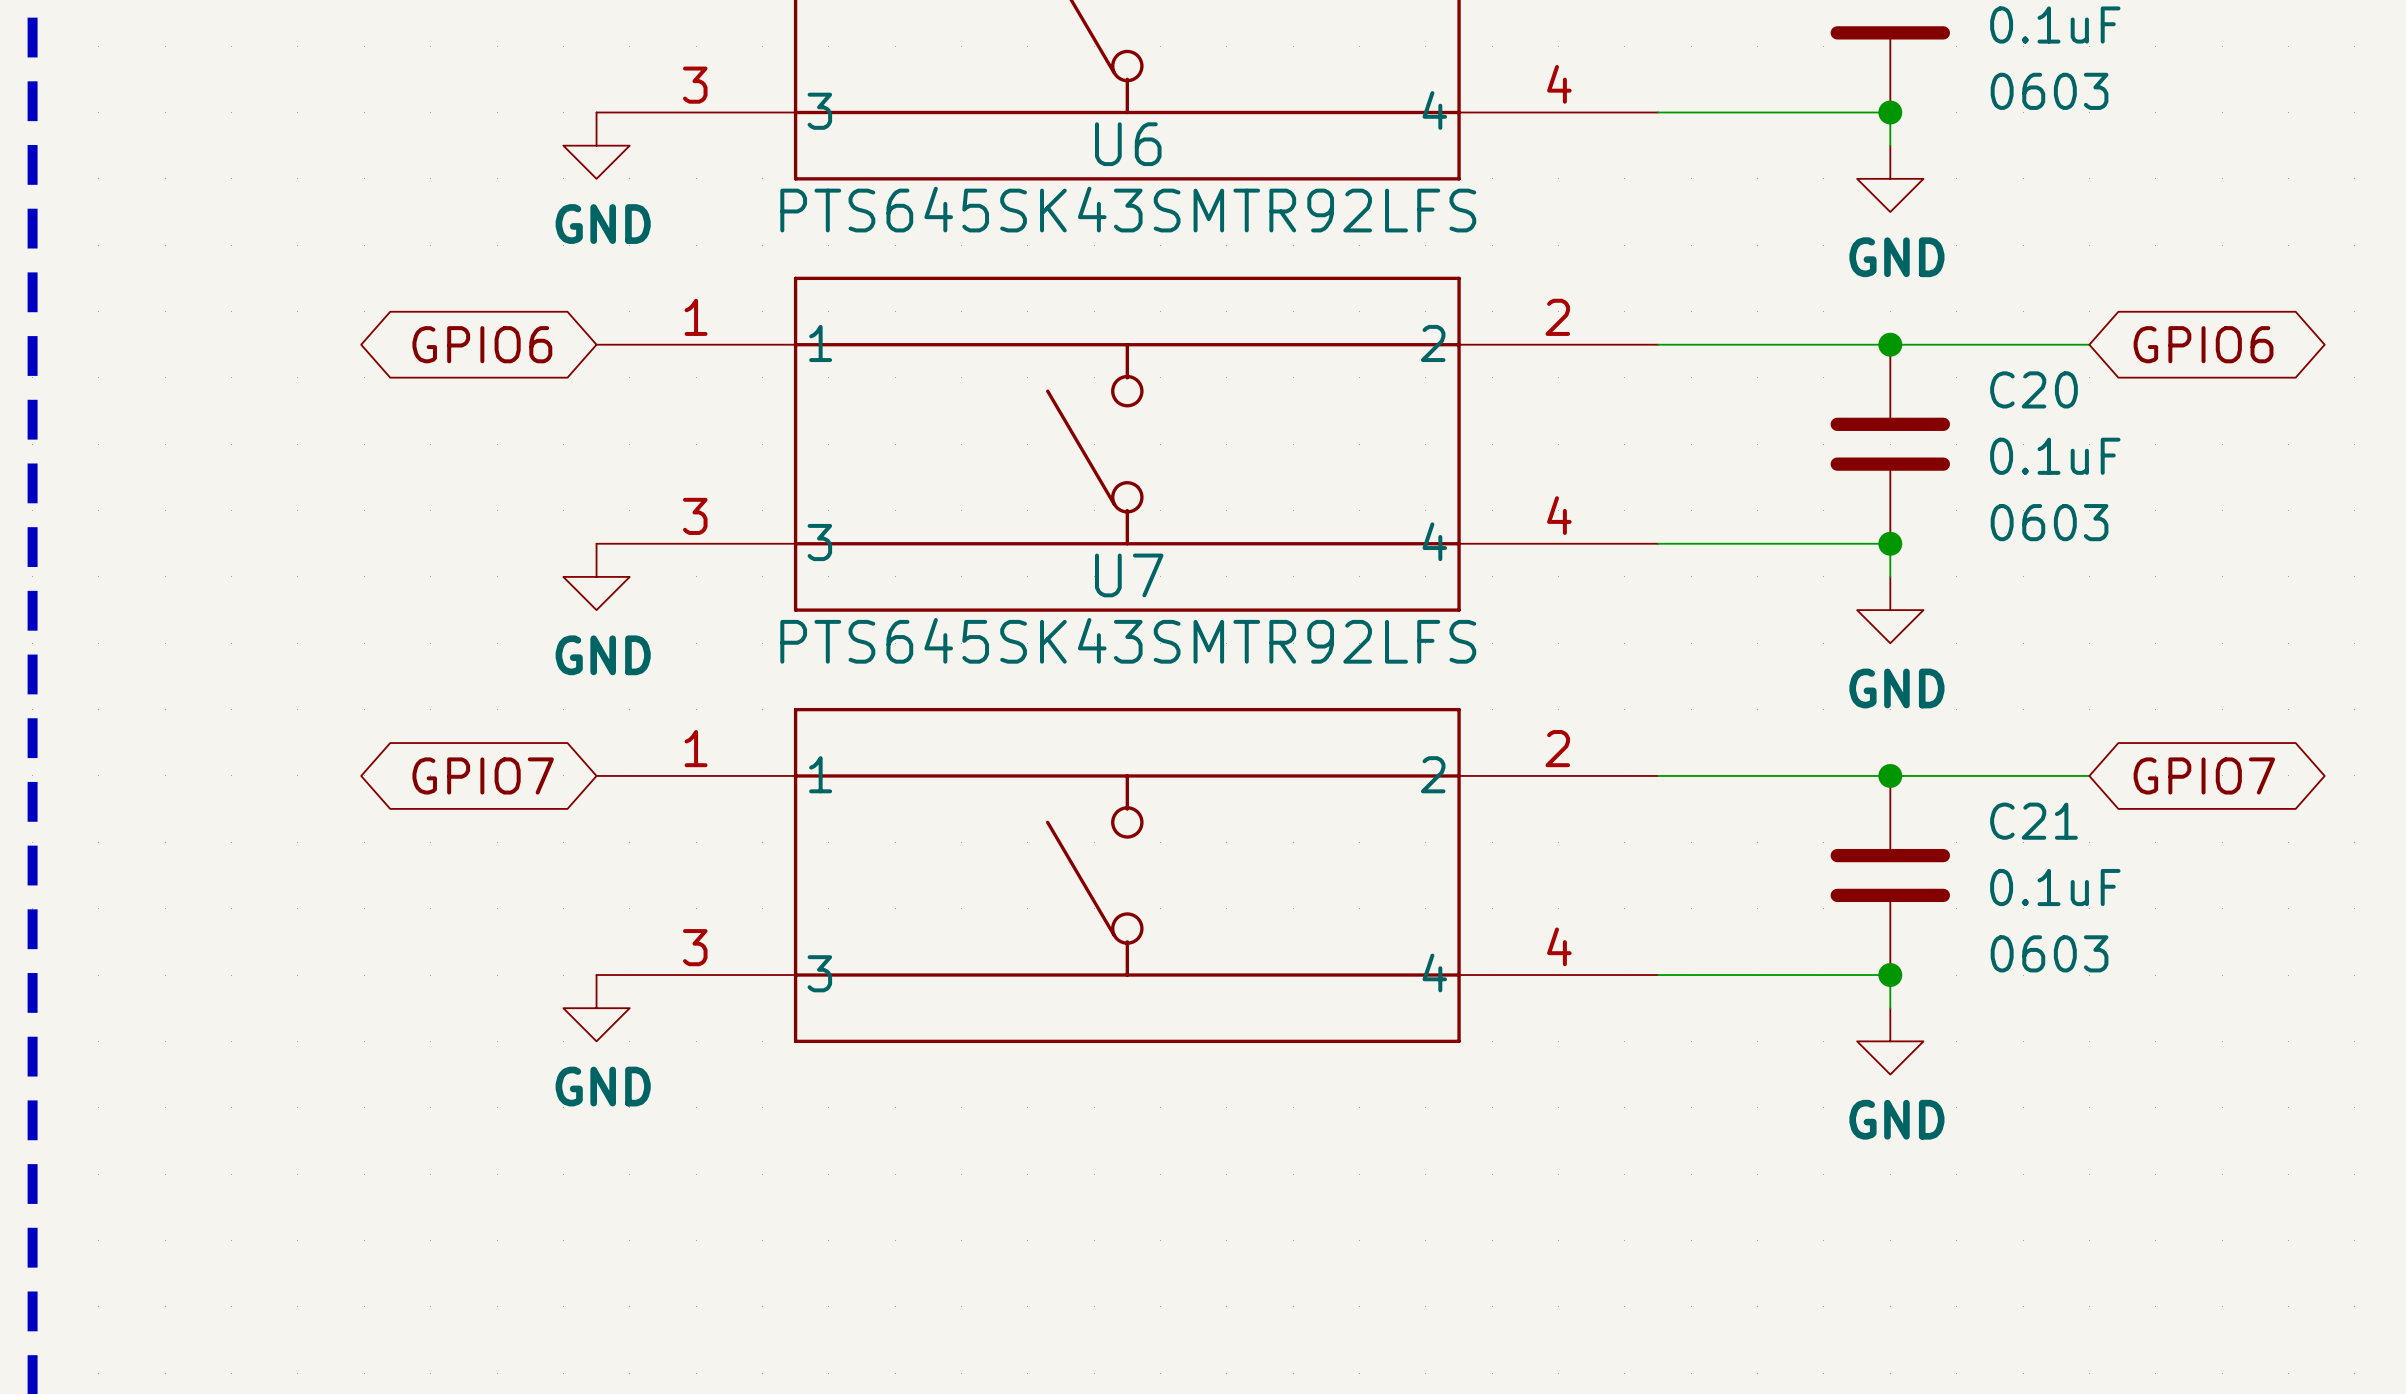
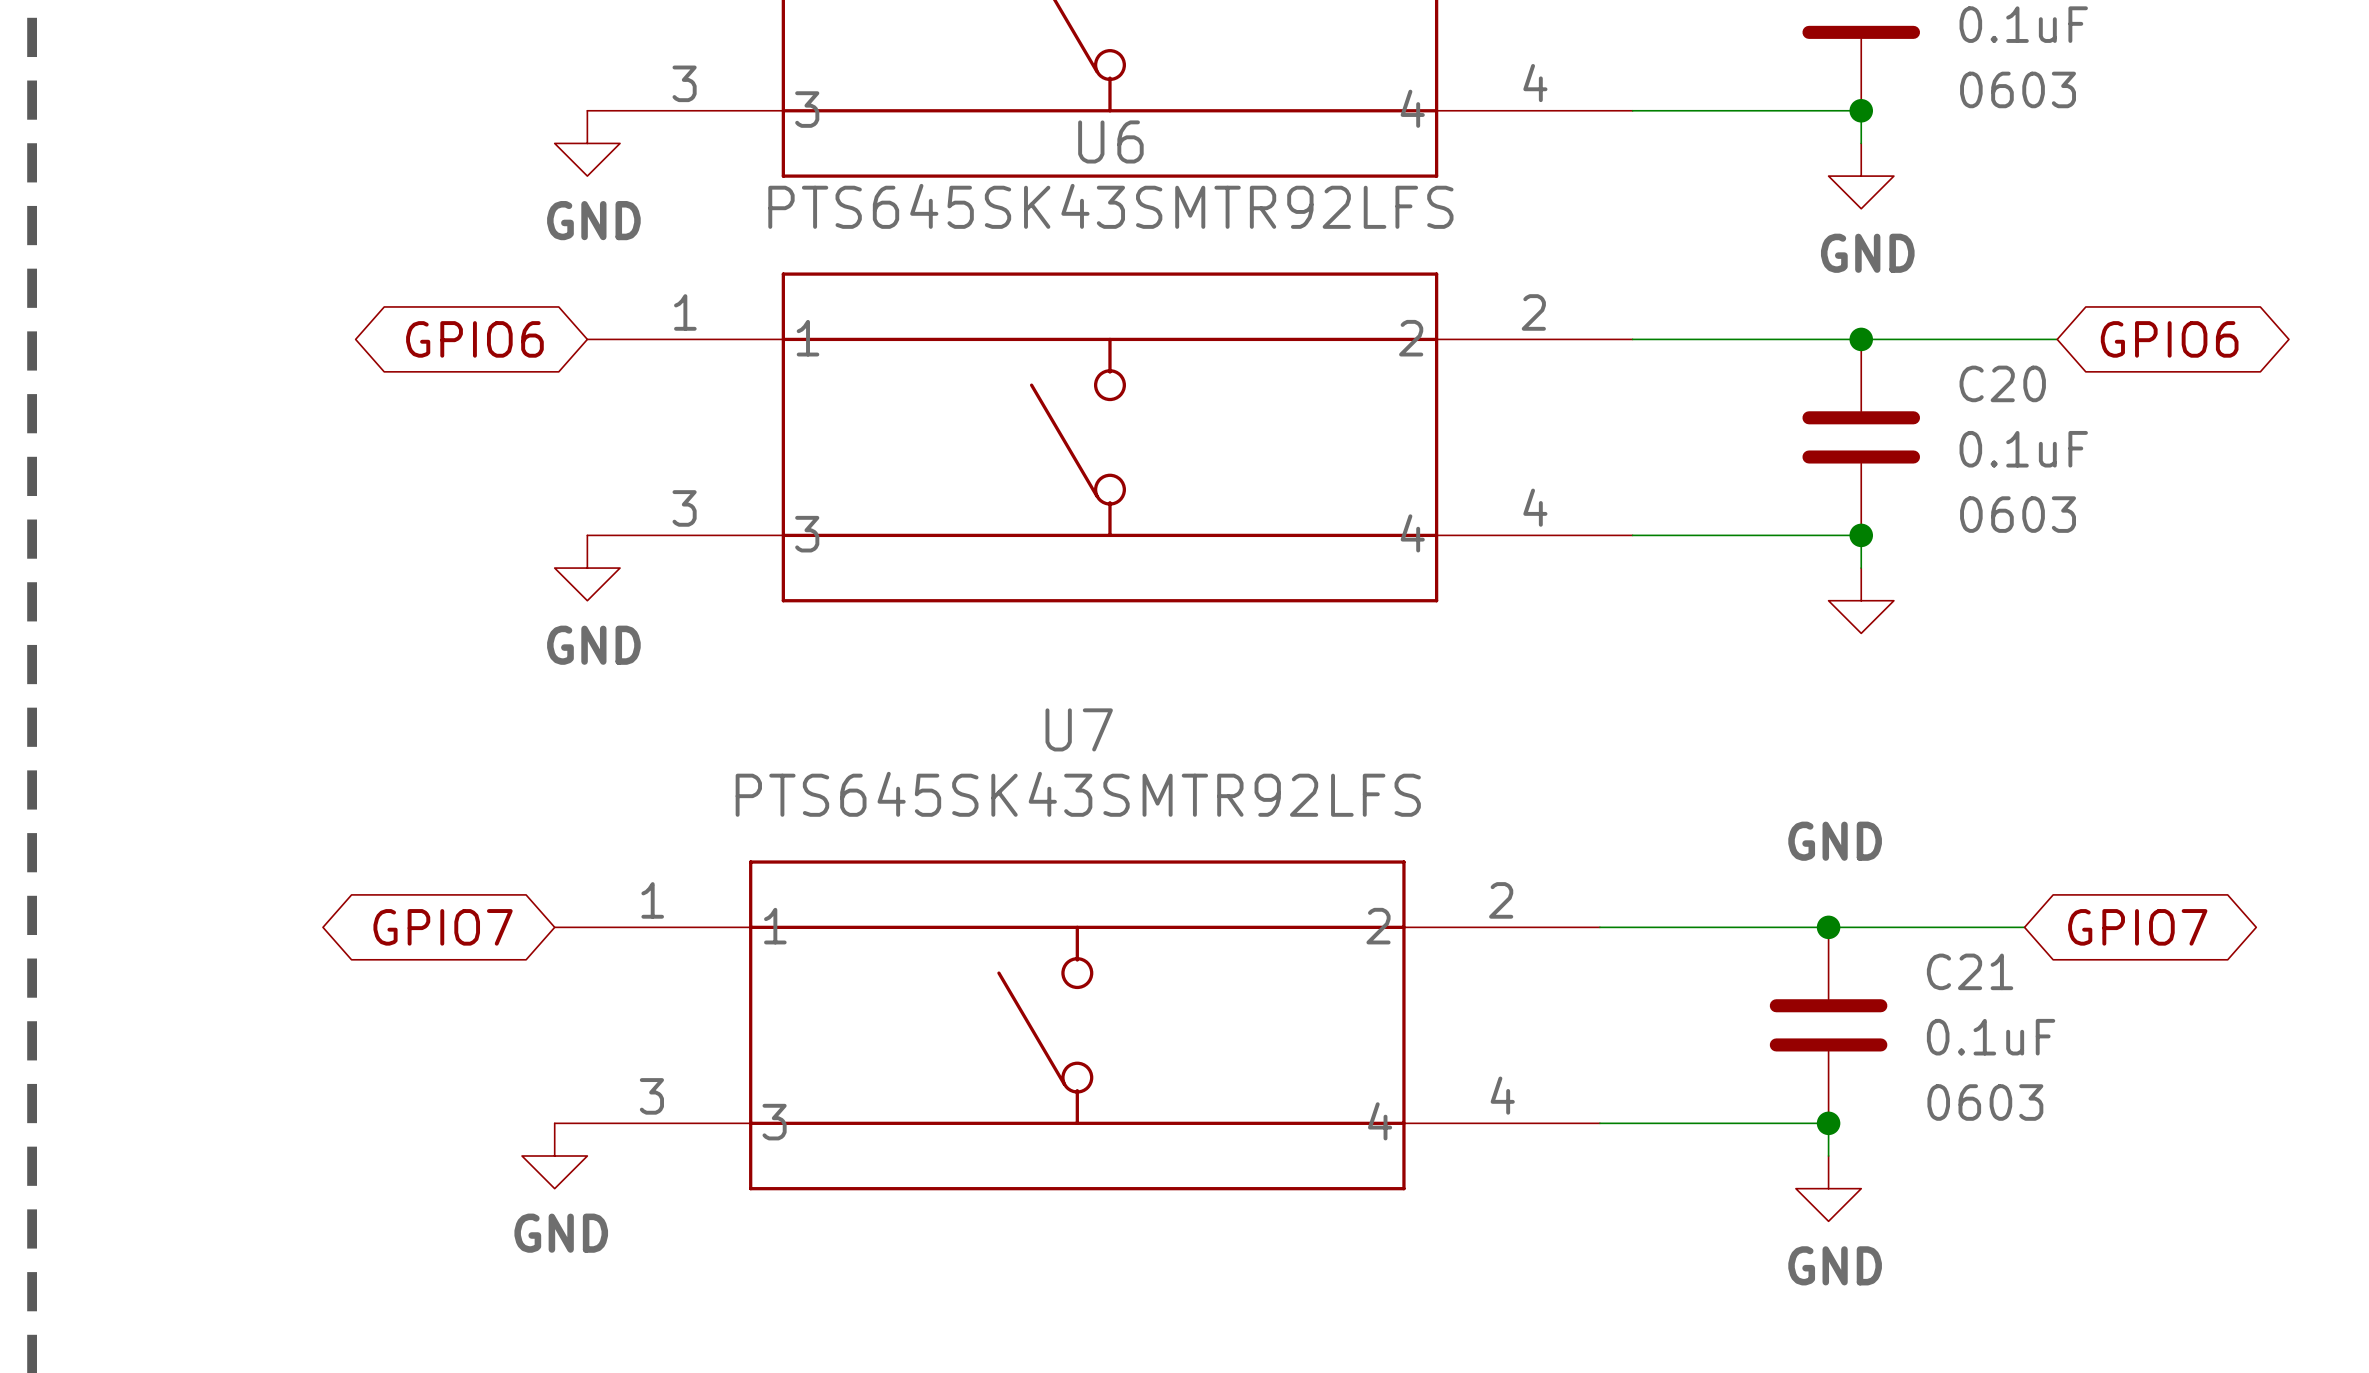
power symbol text position: GND (1896, 688) -> GND (1835, 841)
global label position: GPIO7 (483, 775) -> GPIO7 (443, 927)
wire: (1658, 775) (2089, 775) -> (1599, 927) (2024, 927)
junction: (1890, 775) -> none
global label position: GPIO7 (2204, 775) -> GPIO7 (2137, 927)
U7 position: (1127, 875) -> (1077, 1025)
C21 position: (1890, 875) -> (1828, 1025)
wire: (1658, 975) (1890, 975) (1890, 1008) -> (1599, 1123) (1828, 1123) (1828, 1156)
junction position: (1890, 975) -> (1828, 927)
power symbol position: GND (596, 1008) -> GND (554, 1156)
power symbol position: GND (1890, 1041) -> GND (1828, 1188)
junction: none -> (1828, 1123)

